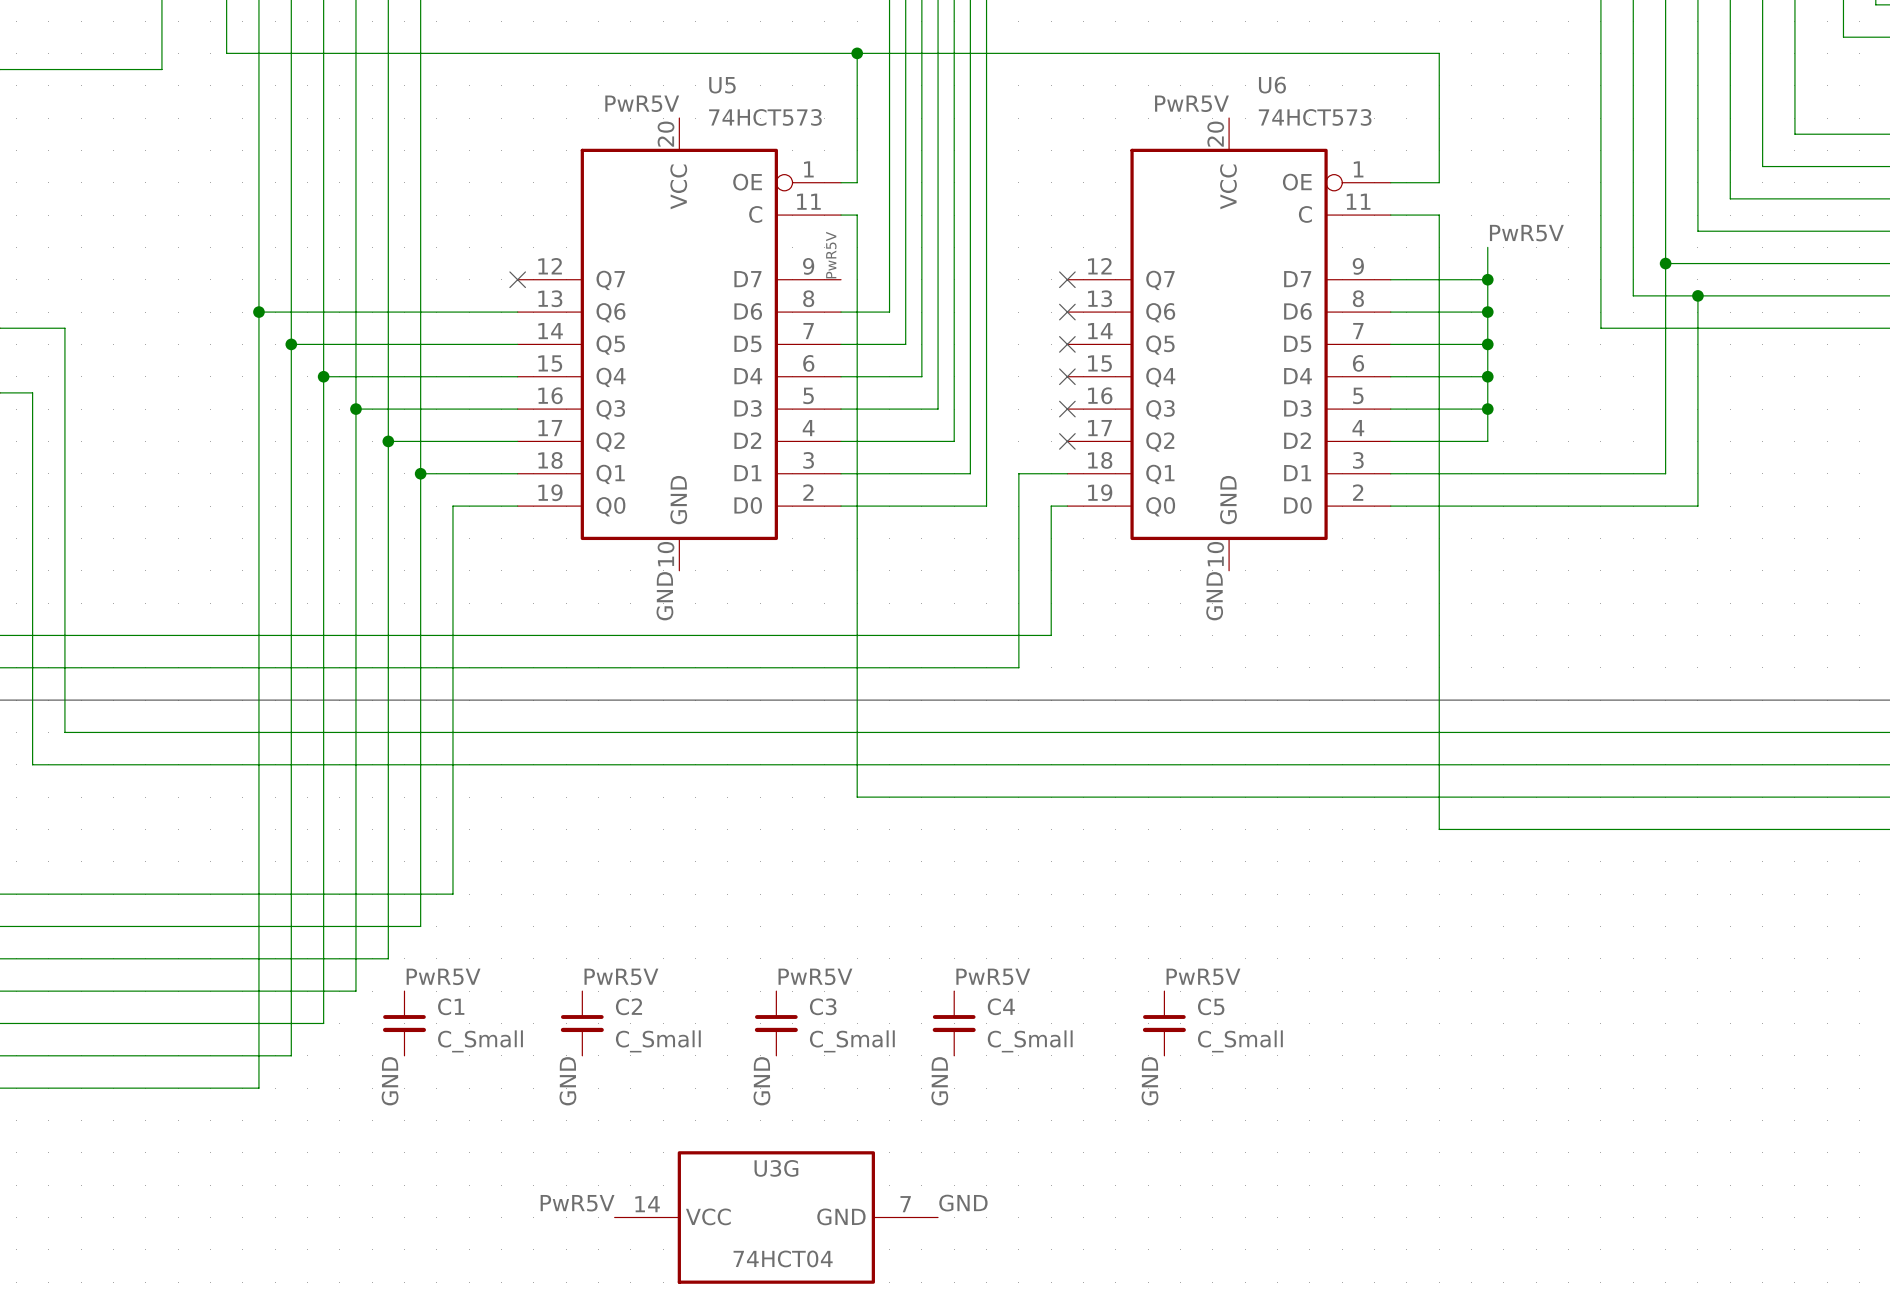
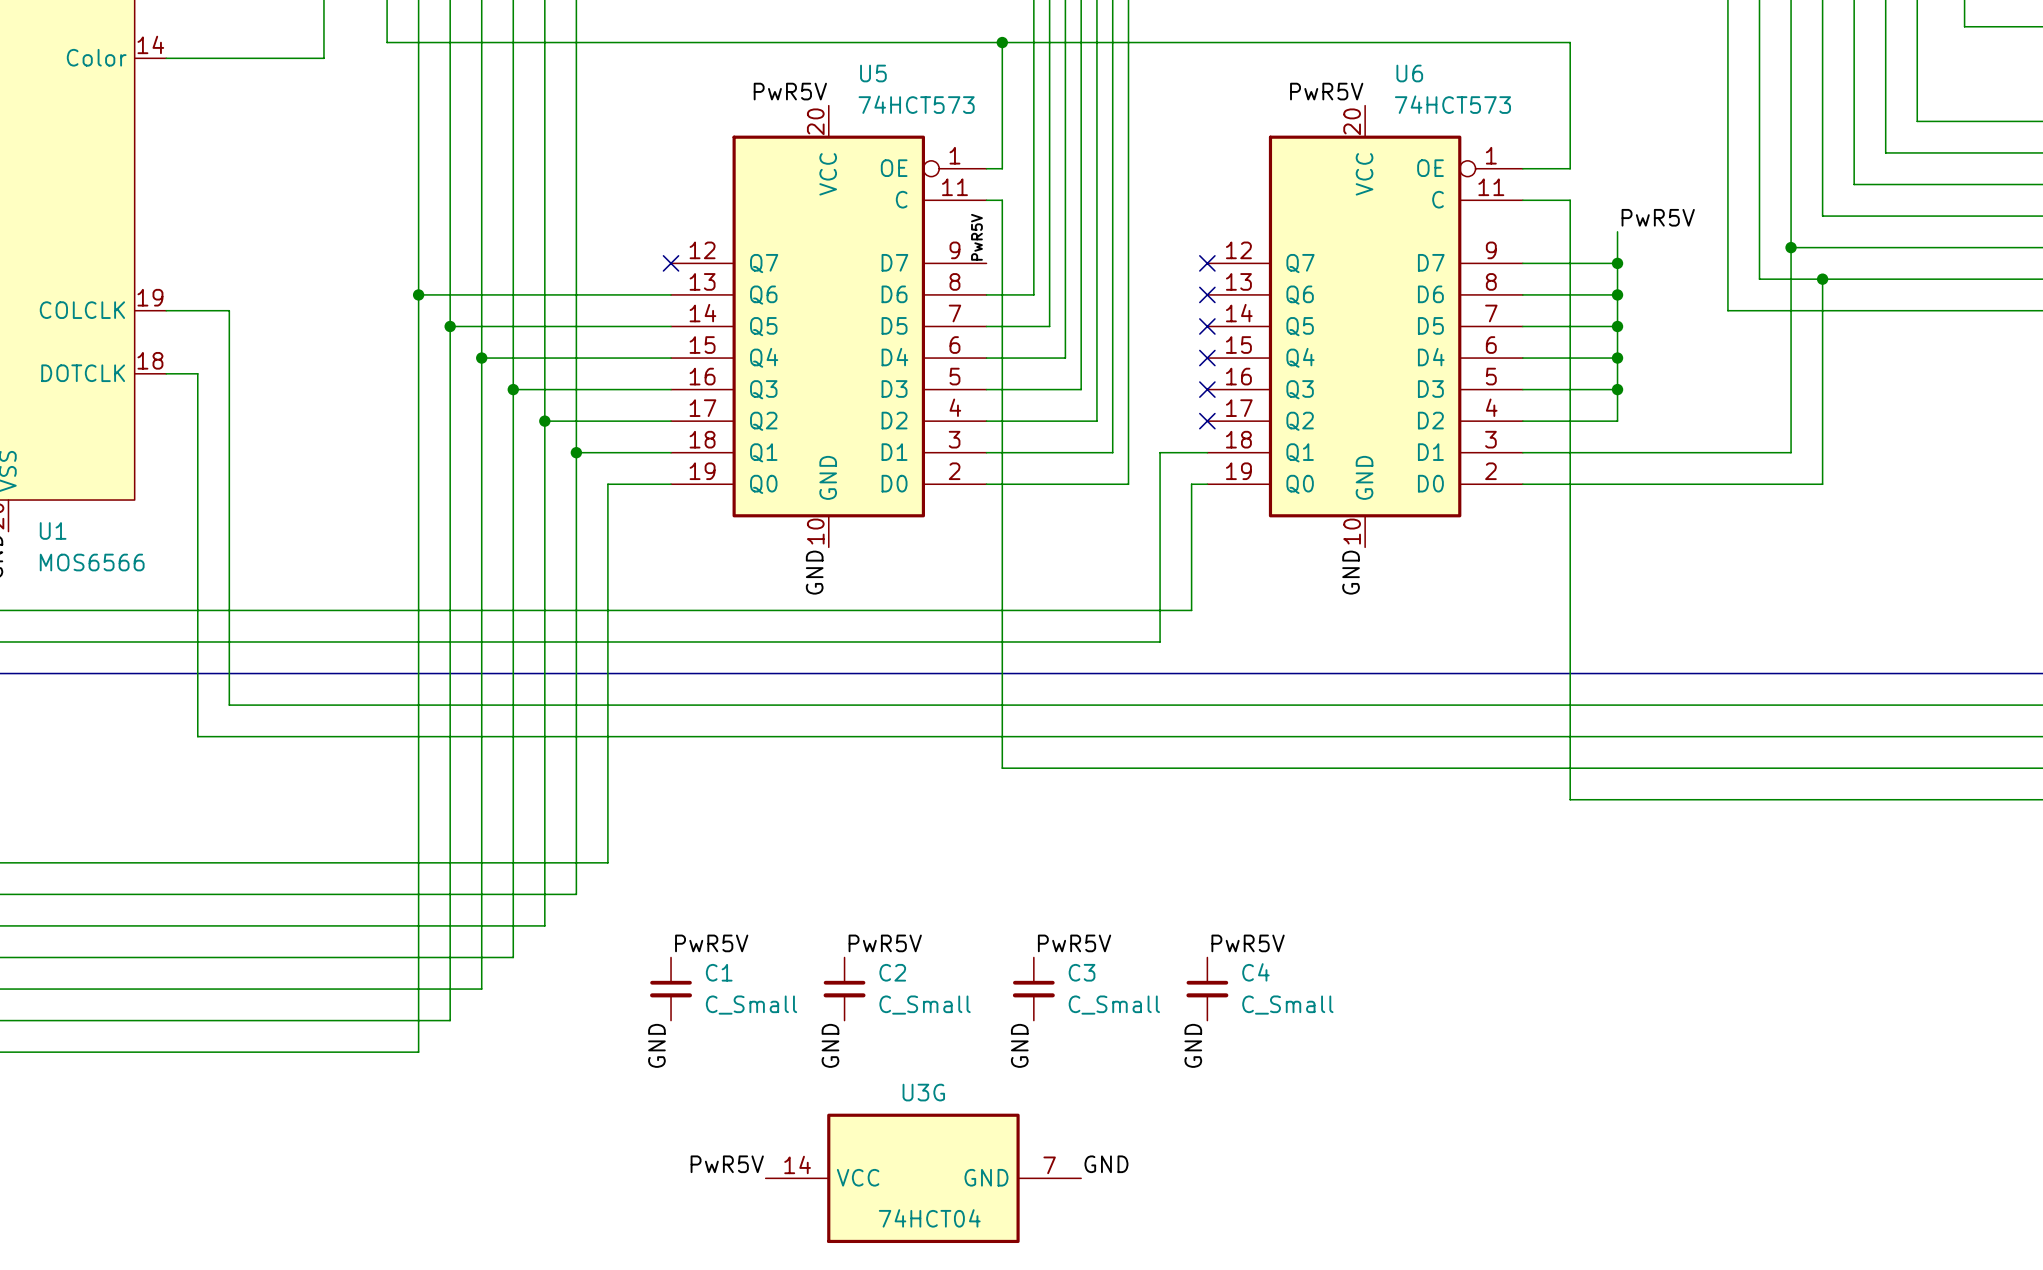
label: PwR5V (443, 976) -> none
label position: PwR5V (621, 976) -> PwR5V (711, 943)
label position: PwR5V (815, 976) -> PwR5V (885, 943)
label position: PwR5V (993, 976) -> PwR5V (1074, 943)
label: none -> PwR5V (1248, 943)
label: PwR5V (1203, 976) -> none
C1 position: (404, 1023) -> (671, 989)
C2 position: (582, 1023) -> (844, 989)
C3 position: (776, 1023) -> (1033, 989)
C4 position: (954, 1023) -> (1207, 989)
C5: C_Small (1164, 1023) -> none
label: GND (390, 1081) -> none
label: none -> GND (656, 1045)
label: GND (567, 1081) -> none
label: none -> GND (830, 1045)
label: GND (761, 1081) -> none
label: none -> GND (1019, 1045)
label: GND (939, 1081) -> none
label: none -> GND (1193, 1045)
label: GND (1149, 1081) -> none
U3G name position: U3G (776, 1168) -> U3G (923, 1092)

